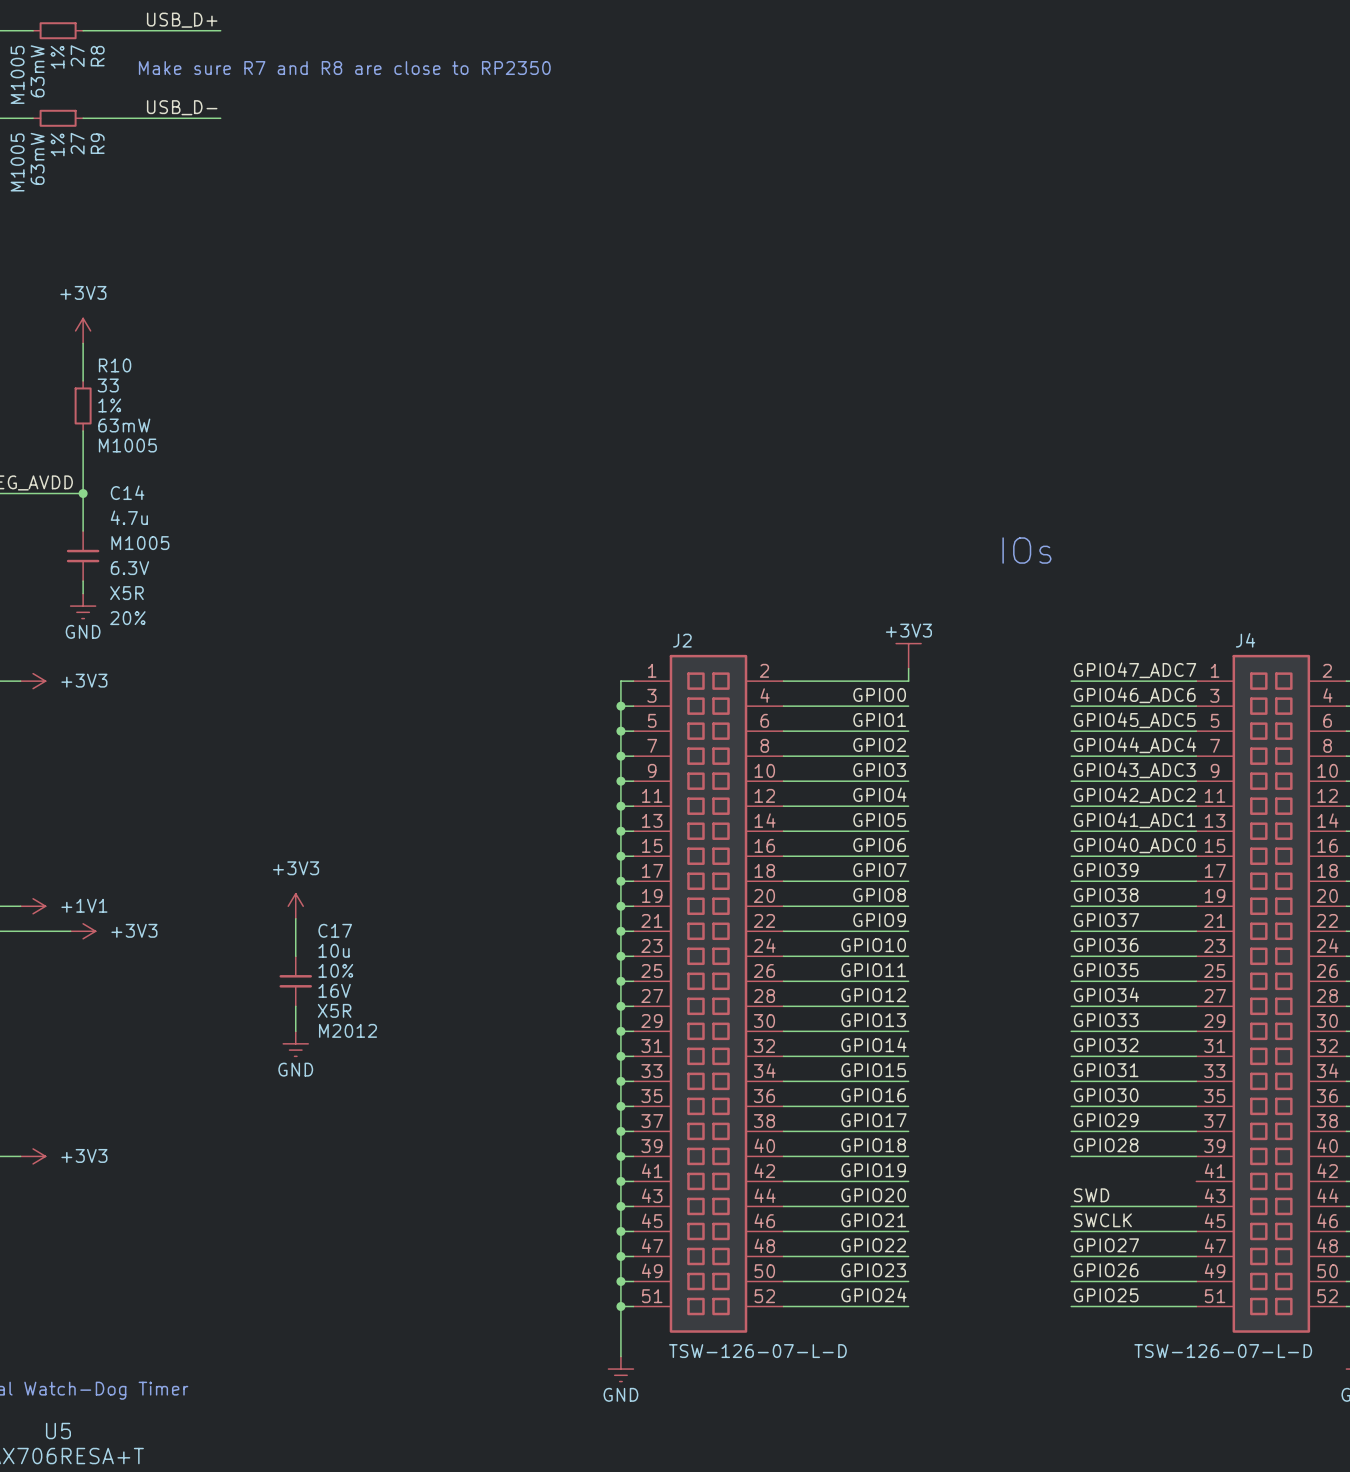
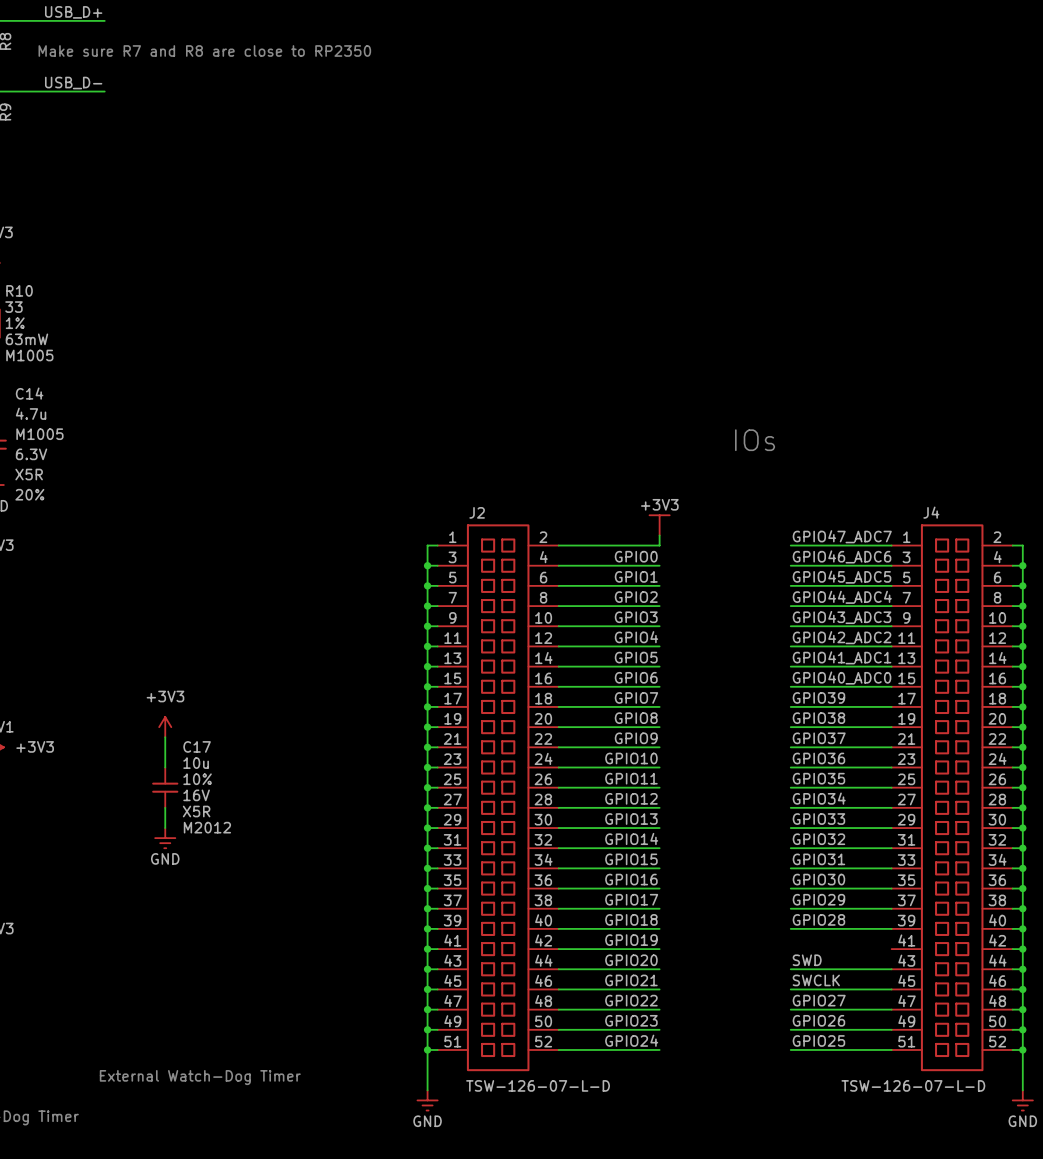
text: none -> External Watch-Dog Timer (200, 1077)

